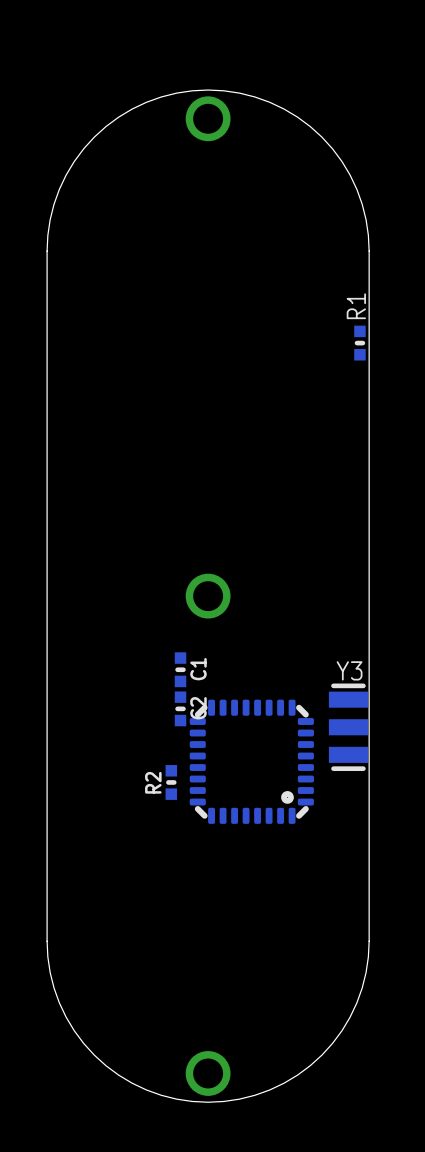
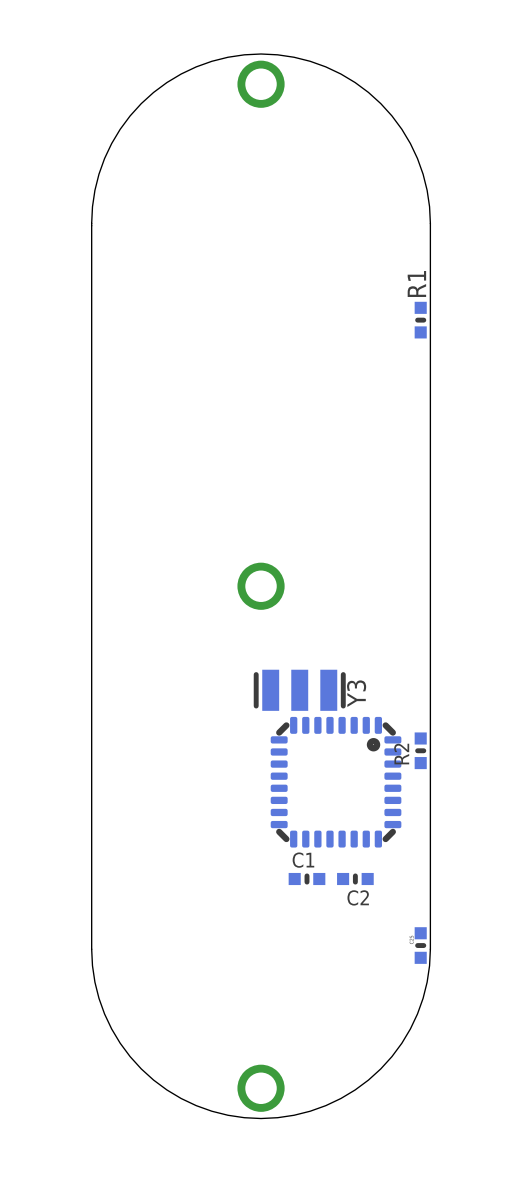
C1 rotation: 0° (180, 669) -> 90° clockwise (306, 879)
C1 position: (180, 669) -> (306, 879)
C2 rotation: 0° (180, 708) -> 90° clockwise (355, 879)
C2 position: (180, 708) -> (355, 879)
Y3 rotation: 0° (348, 727) -> 90° clockwise (299, 690)
Y3 position: (348, 727) -> (299, 690)
part rotation: 0° (251, 761) -> 90° counterclockwise (336, 782)
R2 position: (171, 782) -> (420, 750)
part: none -> (420, 945)

